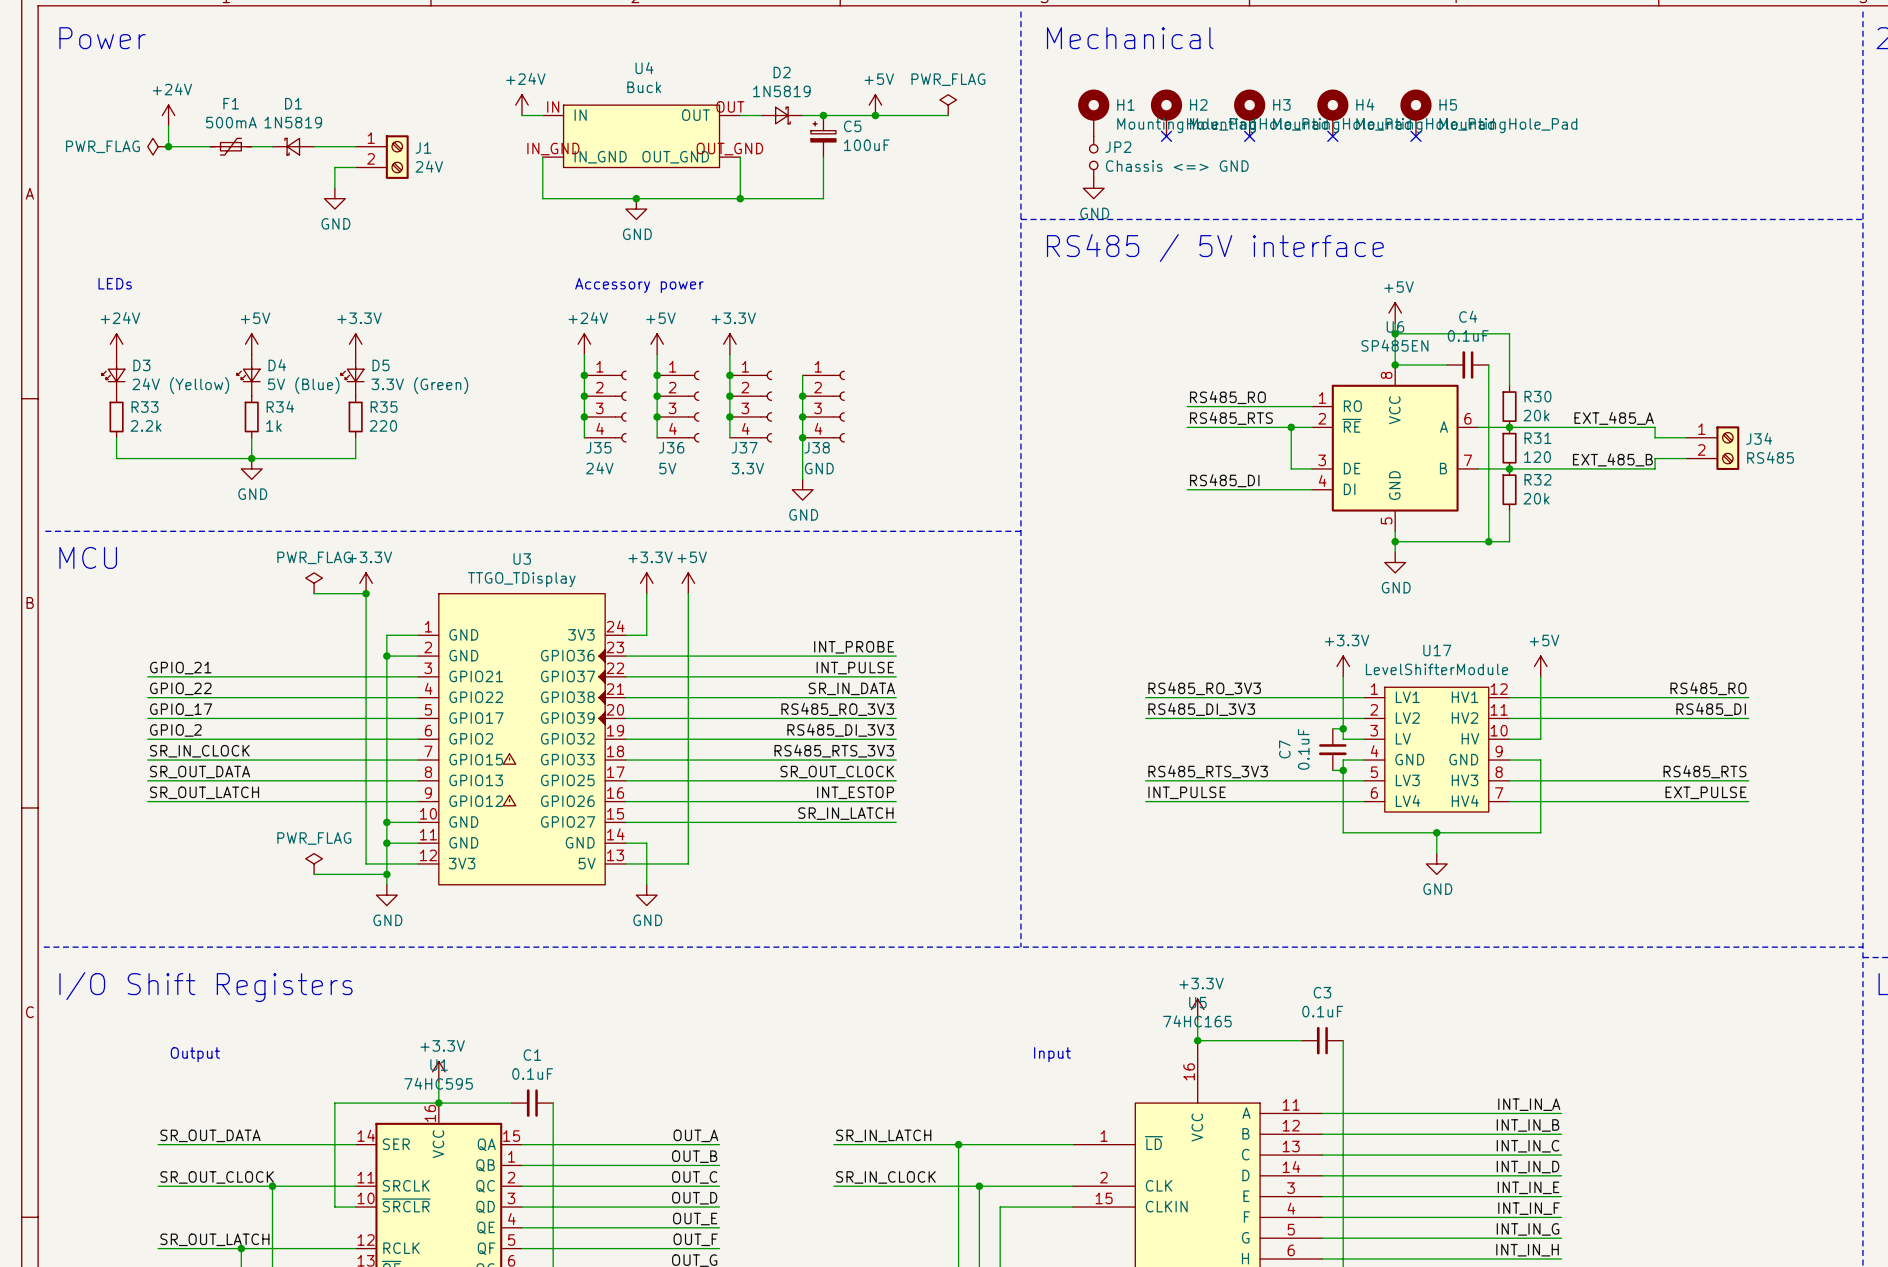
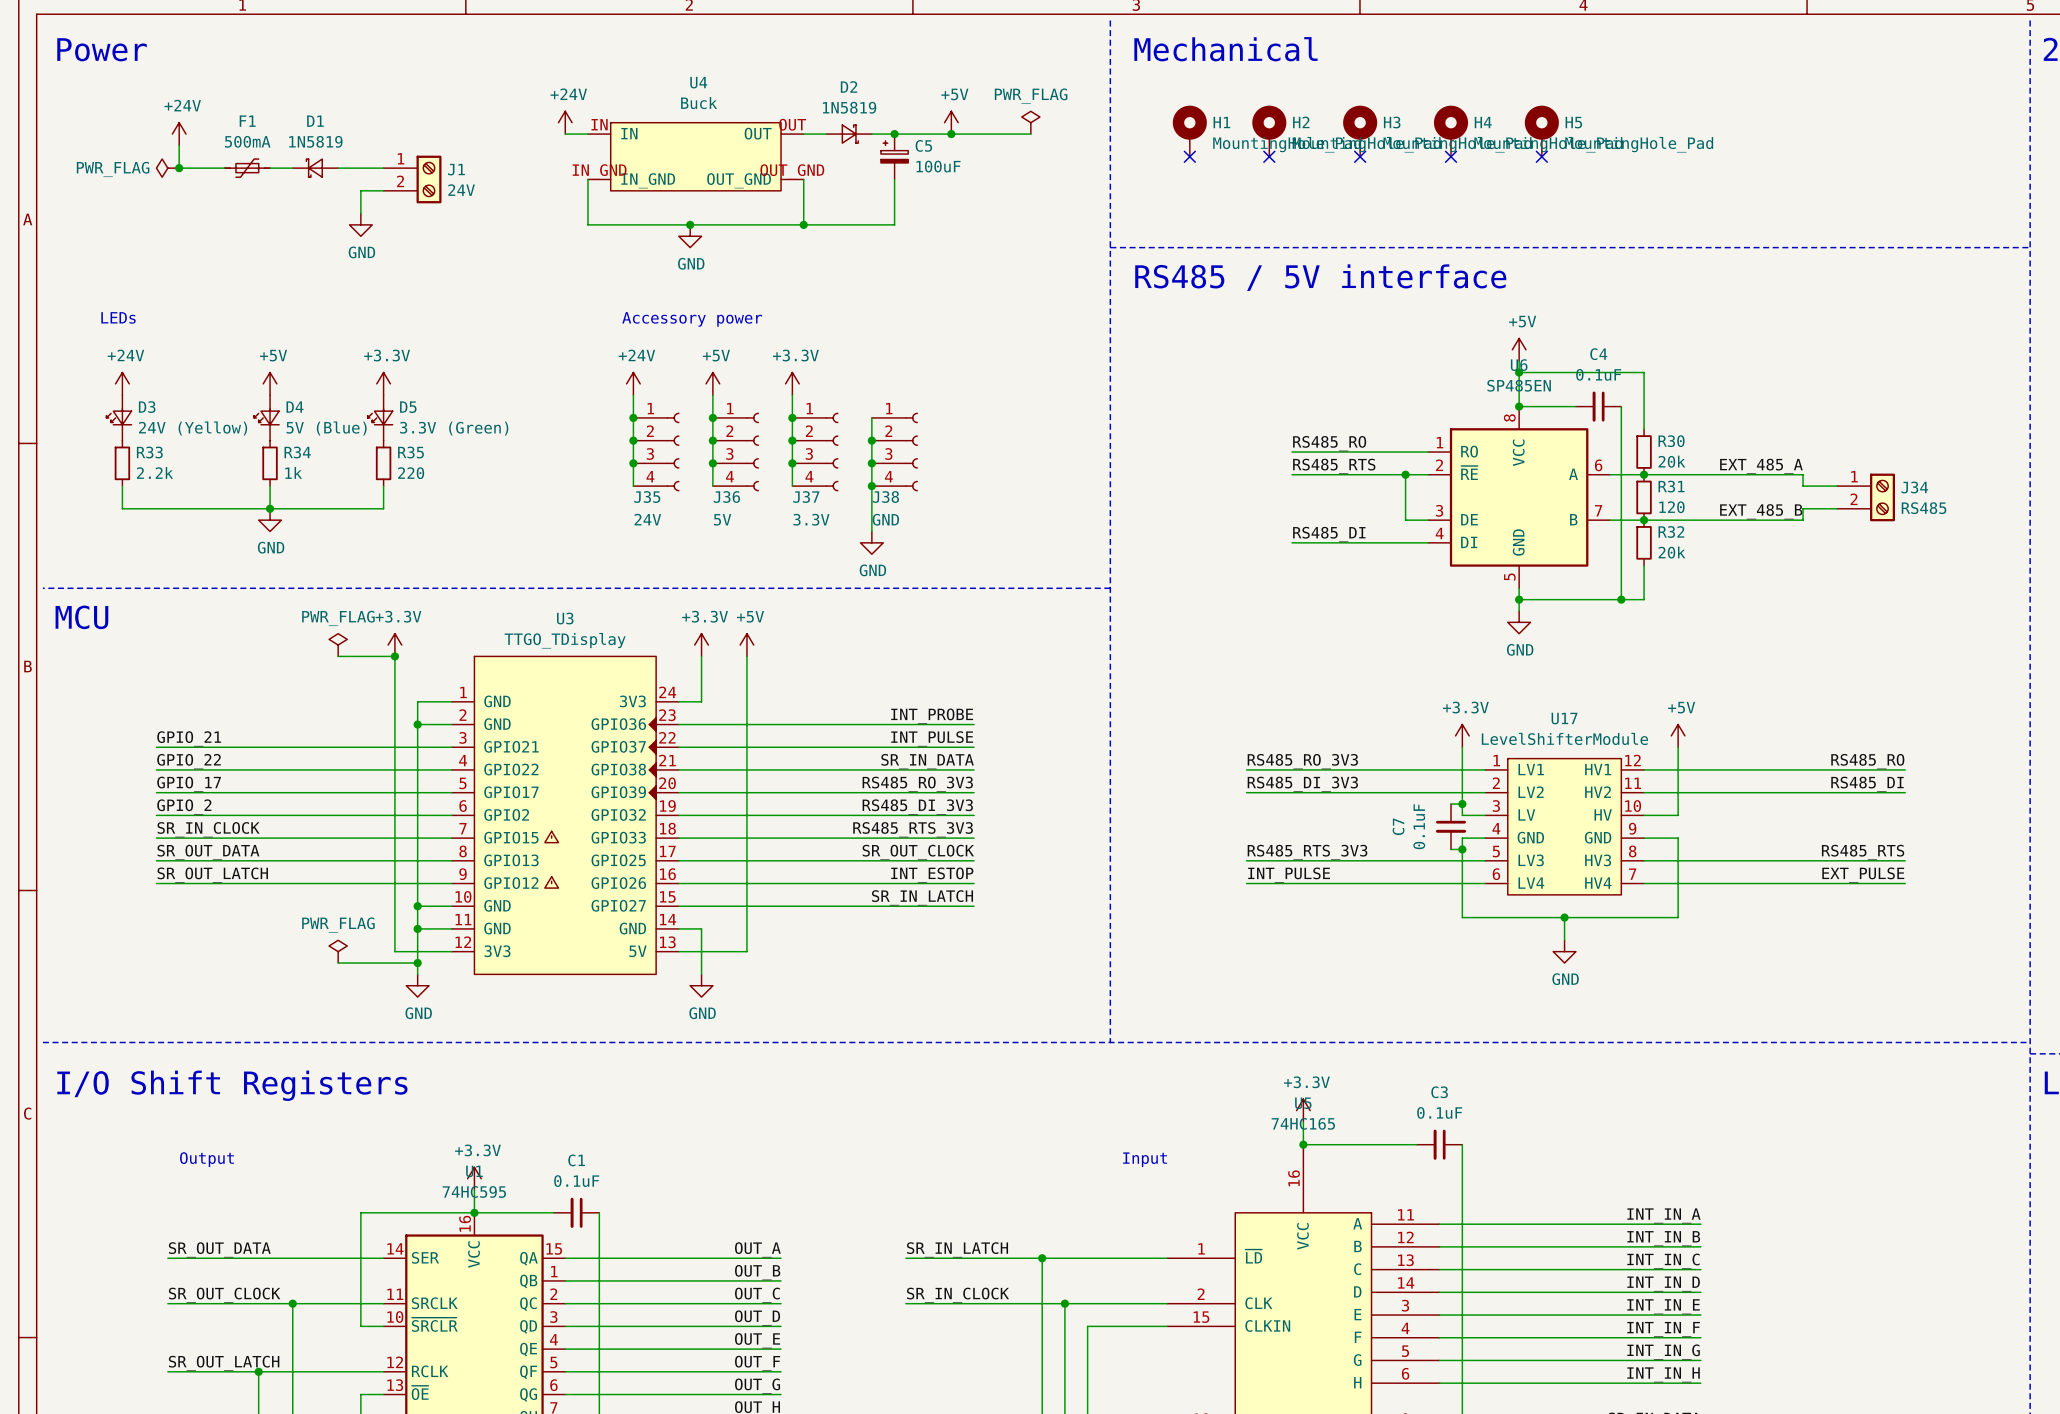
no-connect mark: none -> (1189, 156)
JP2: Chassis <=> GND (1093, 157) -> none
power symbol: GND (1093, 188) -> none

